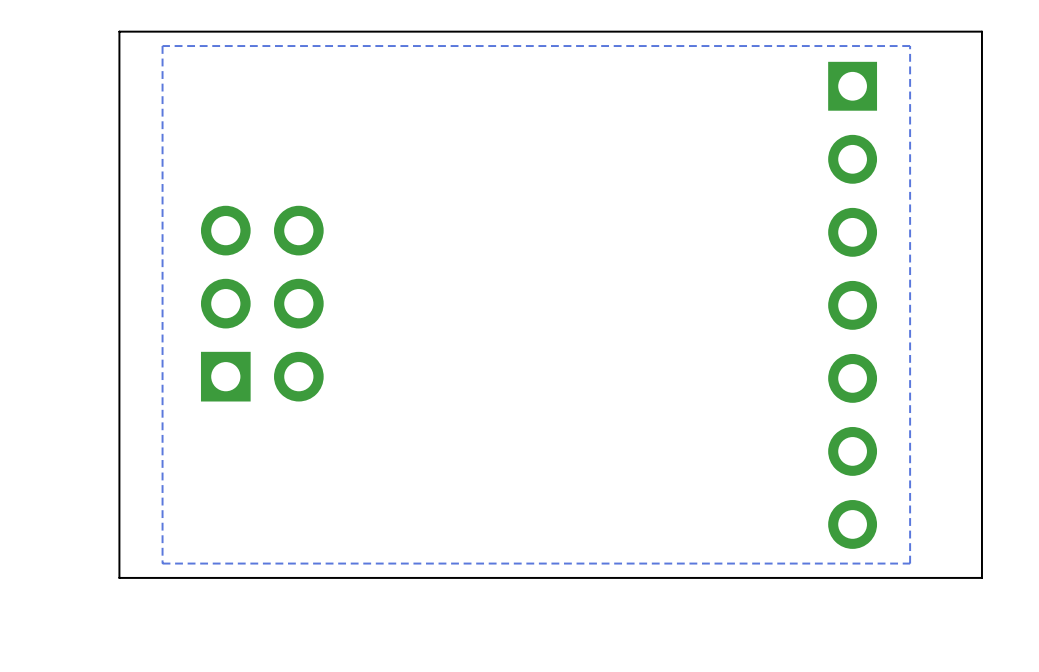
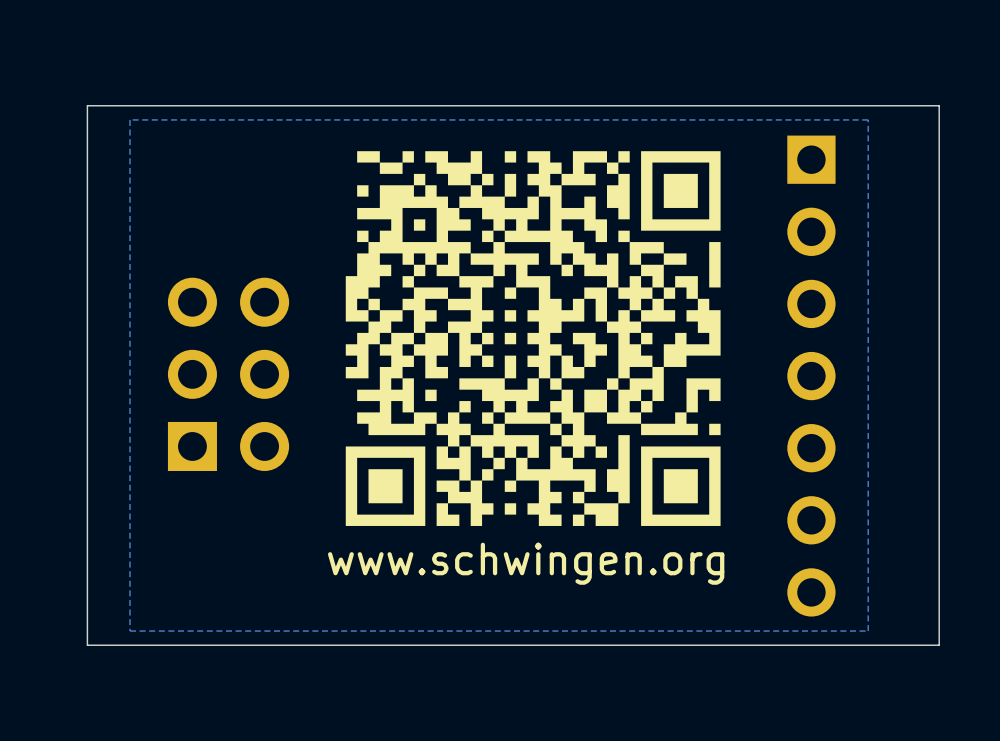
drawing: none -> [345, 151, 721, 526]

